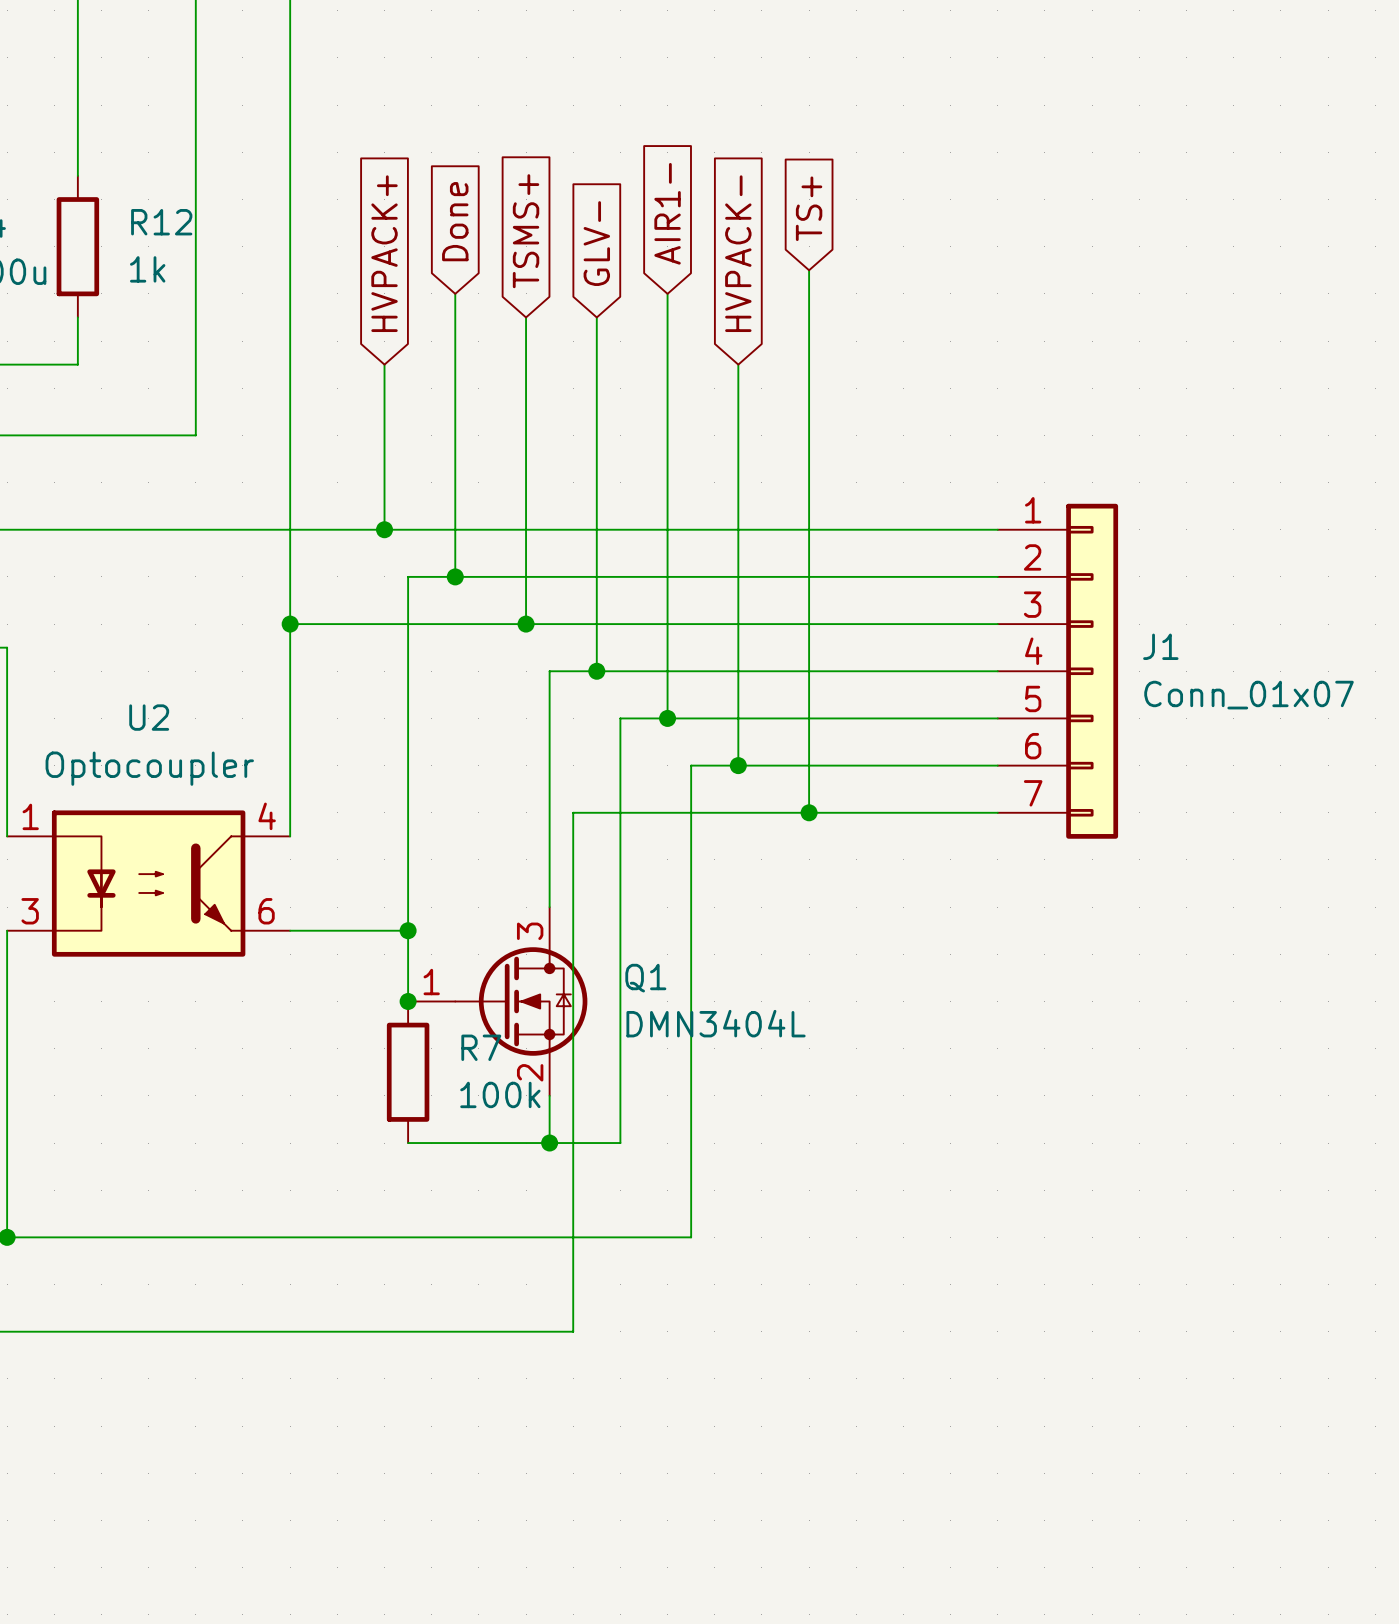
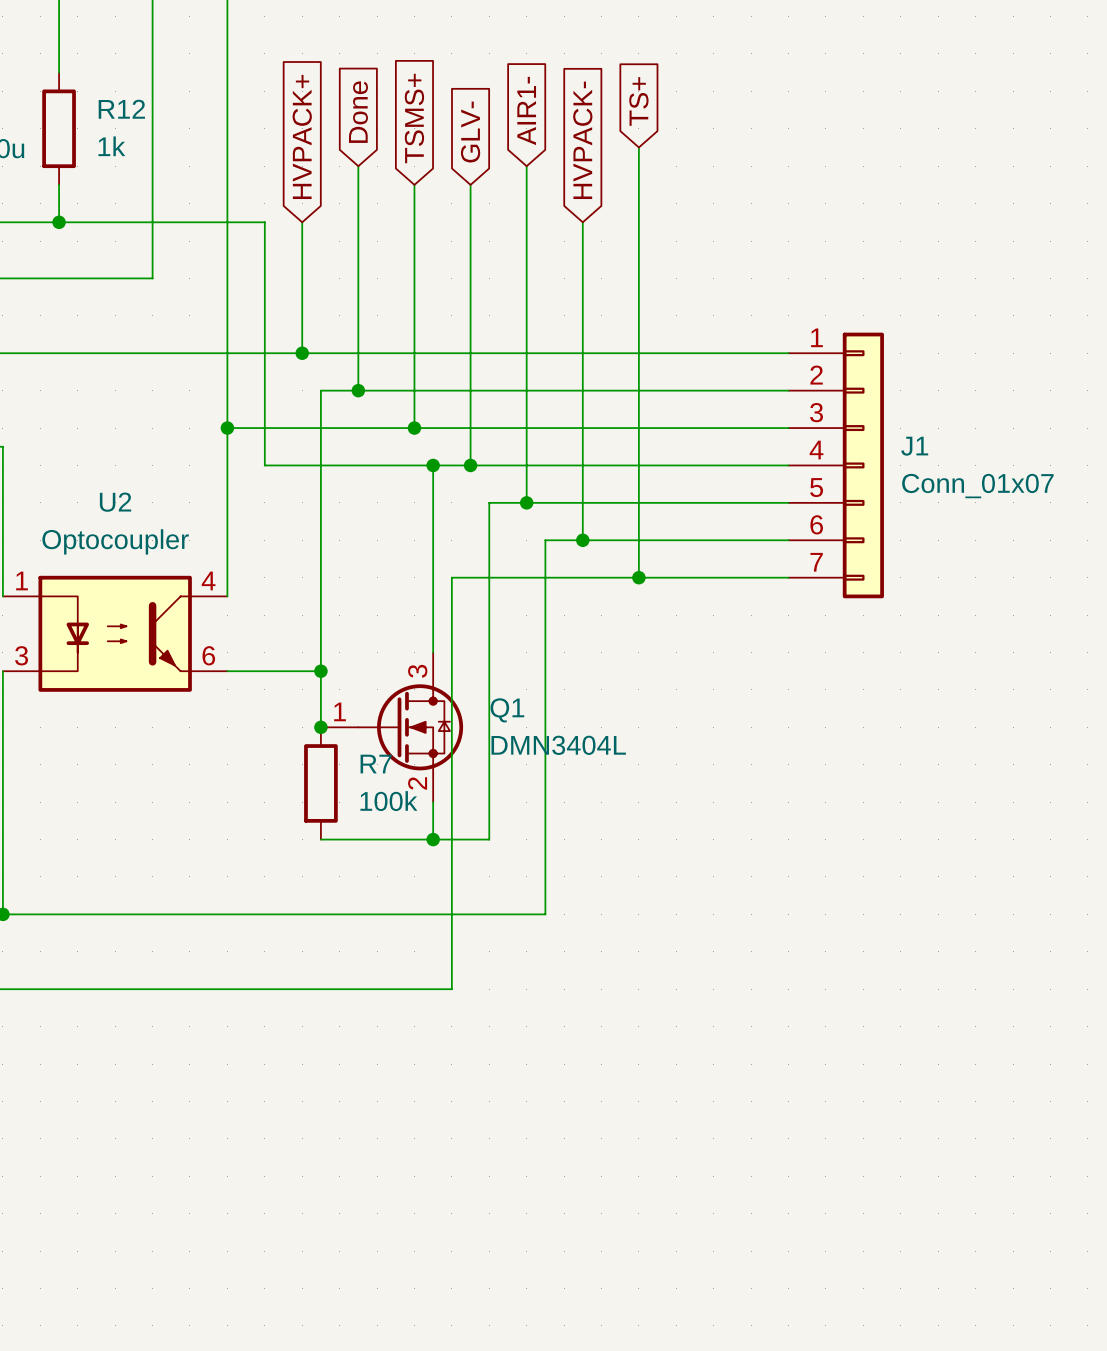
wire: none -> (59, 222) (264, 222) (264, 465) (433, 465)
junction: none -> (59, 222)
junction: none -> (433, 465)

